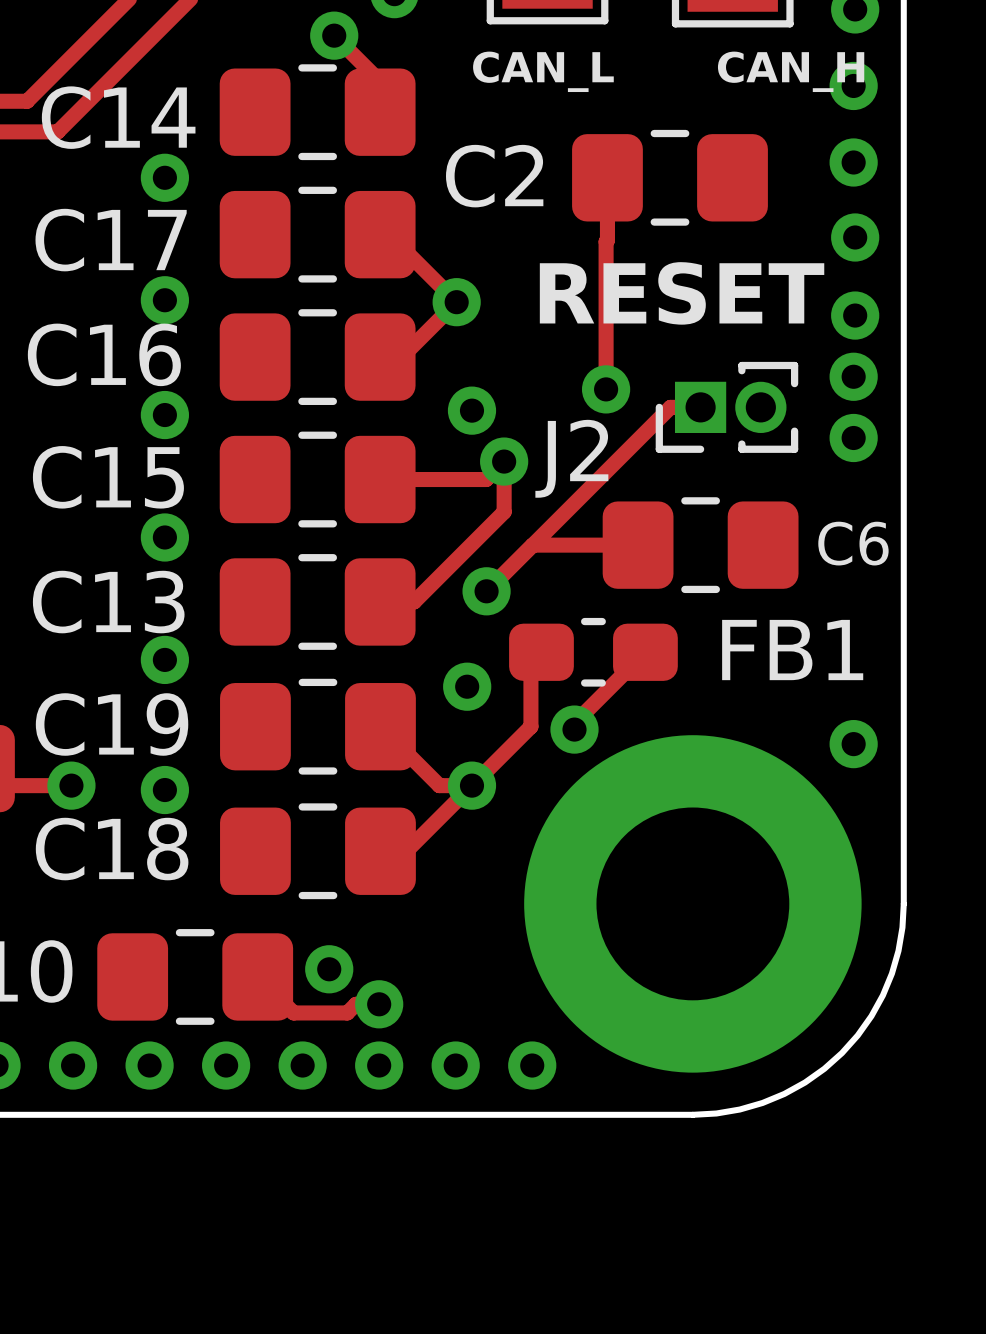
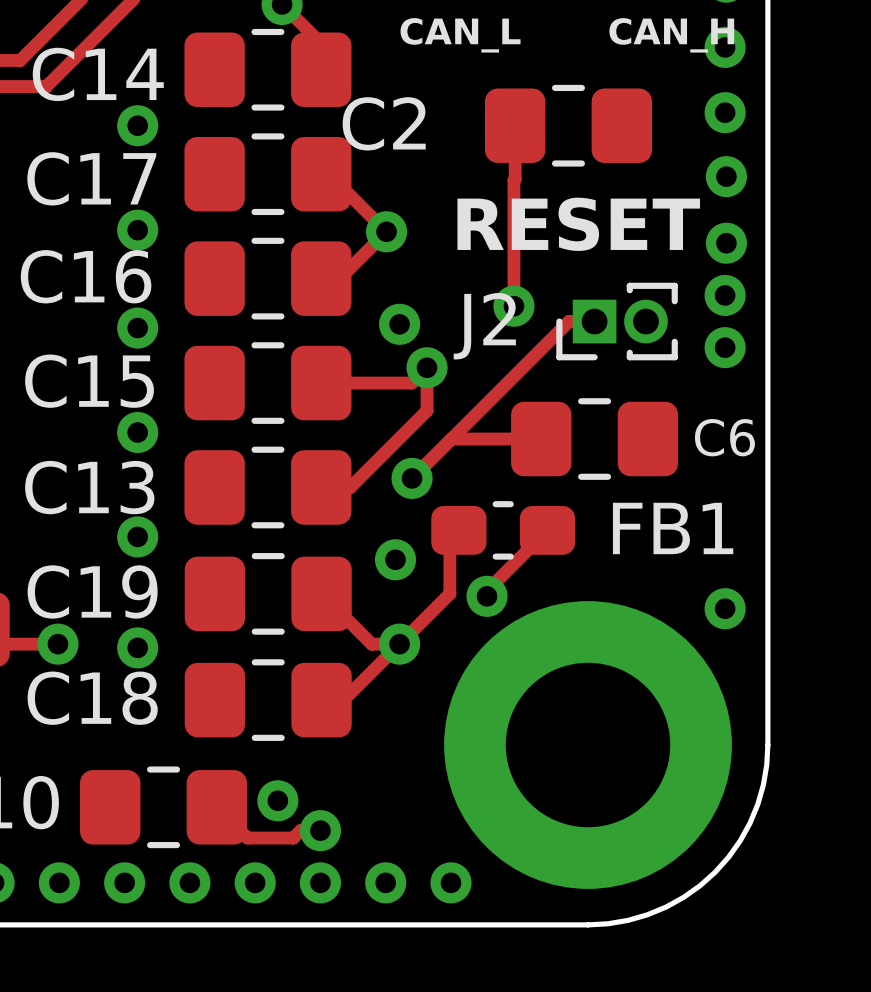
C2 name position: C2 (494, 176) -> C2 (384, 123)
J2 name position: J2 (571, 458) -> J2 (484, 326)

